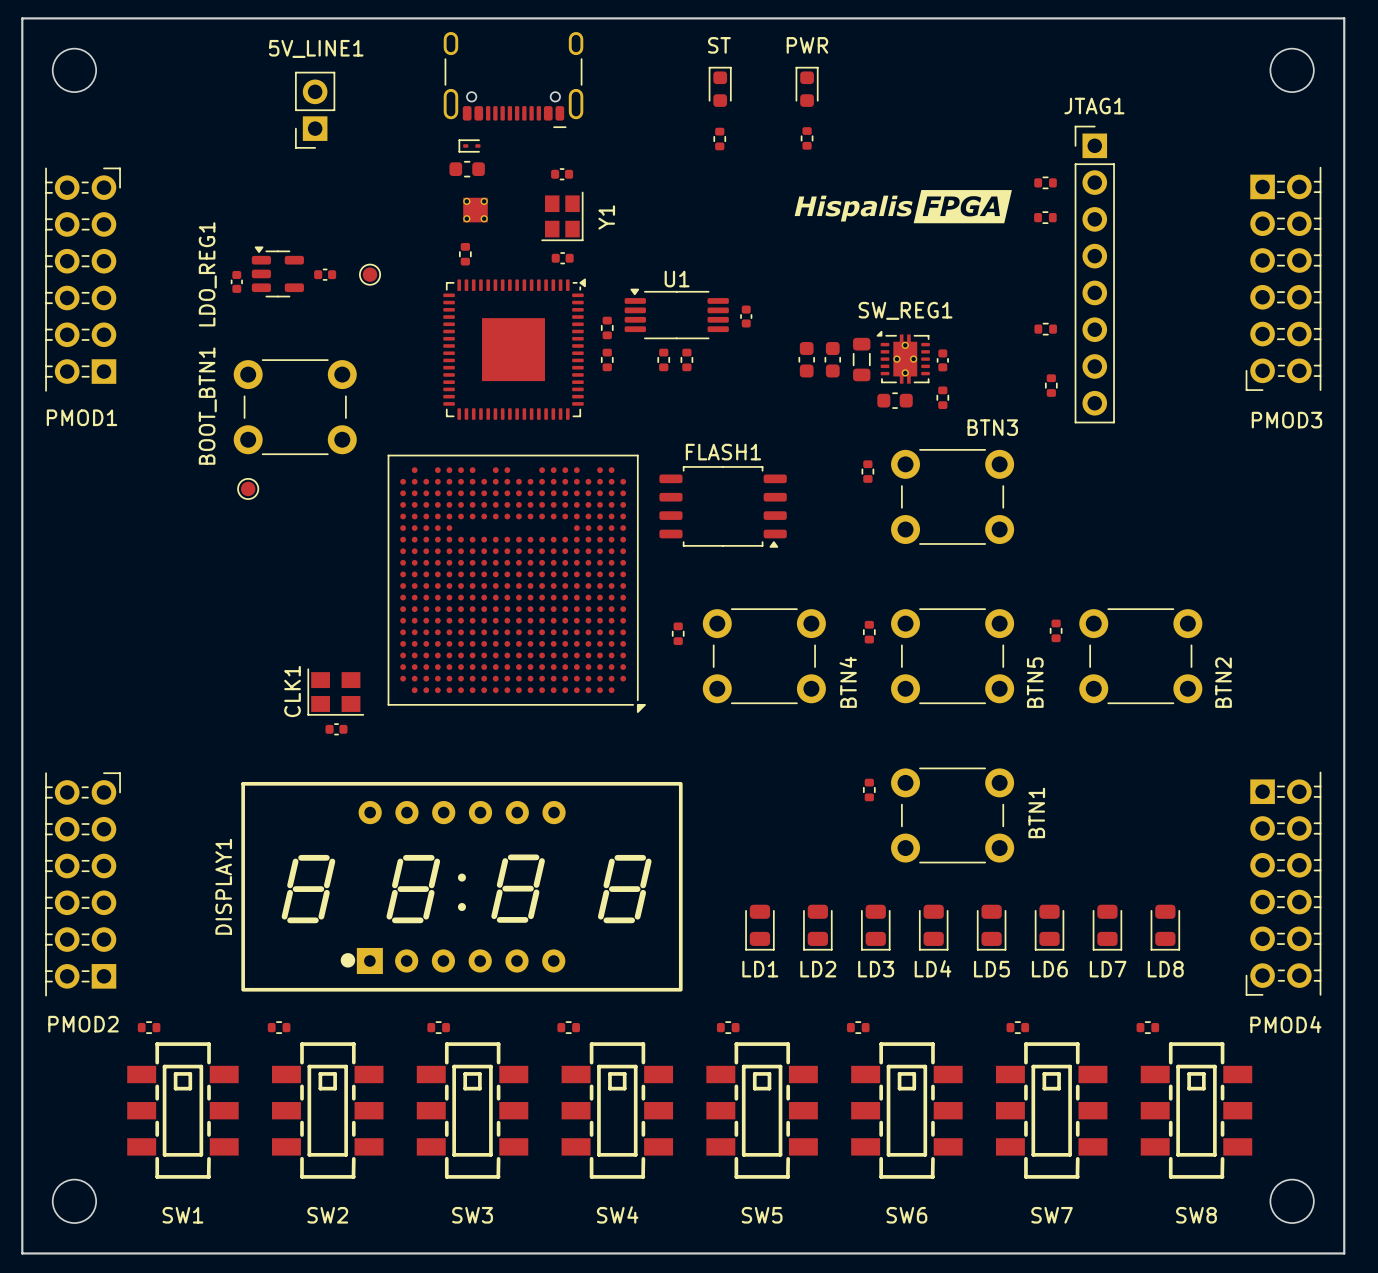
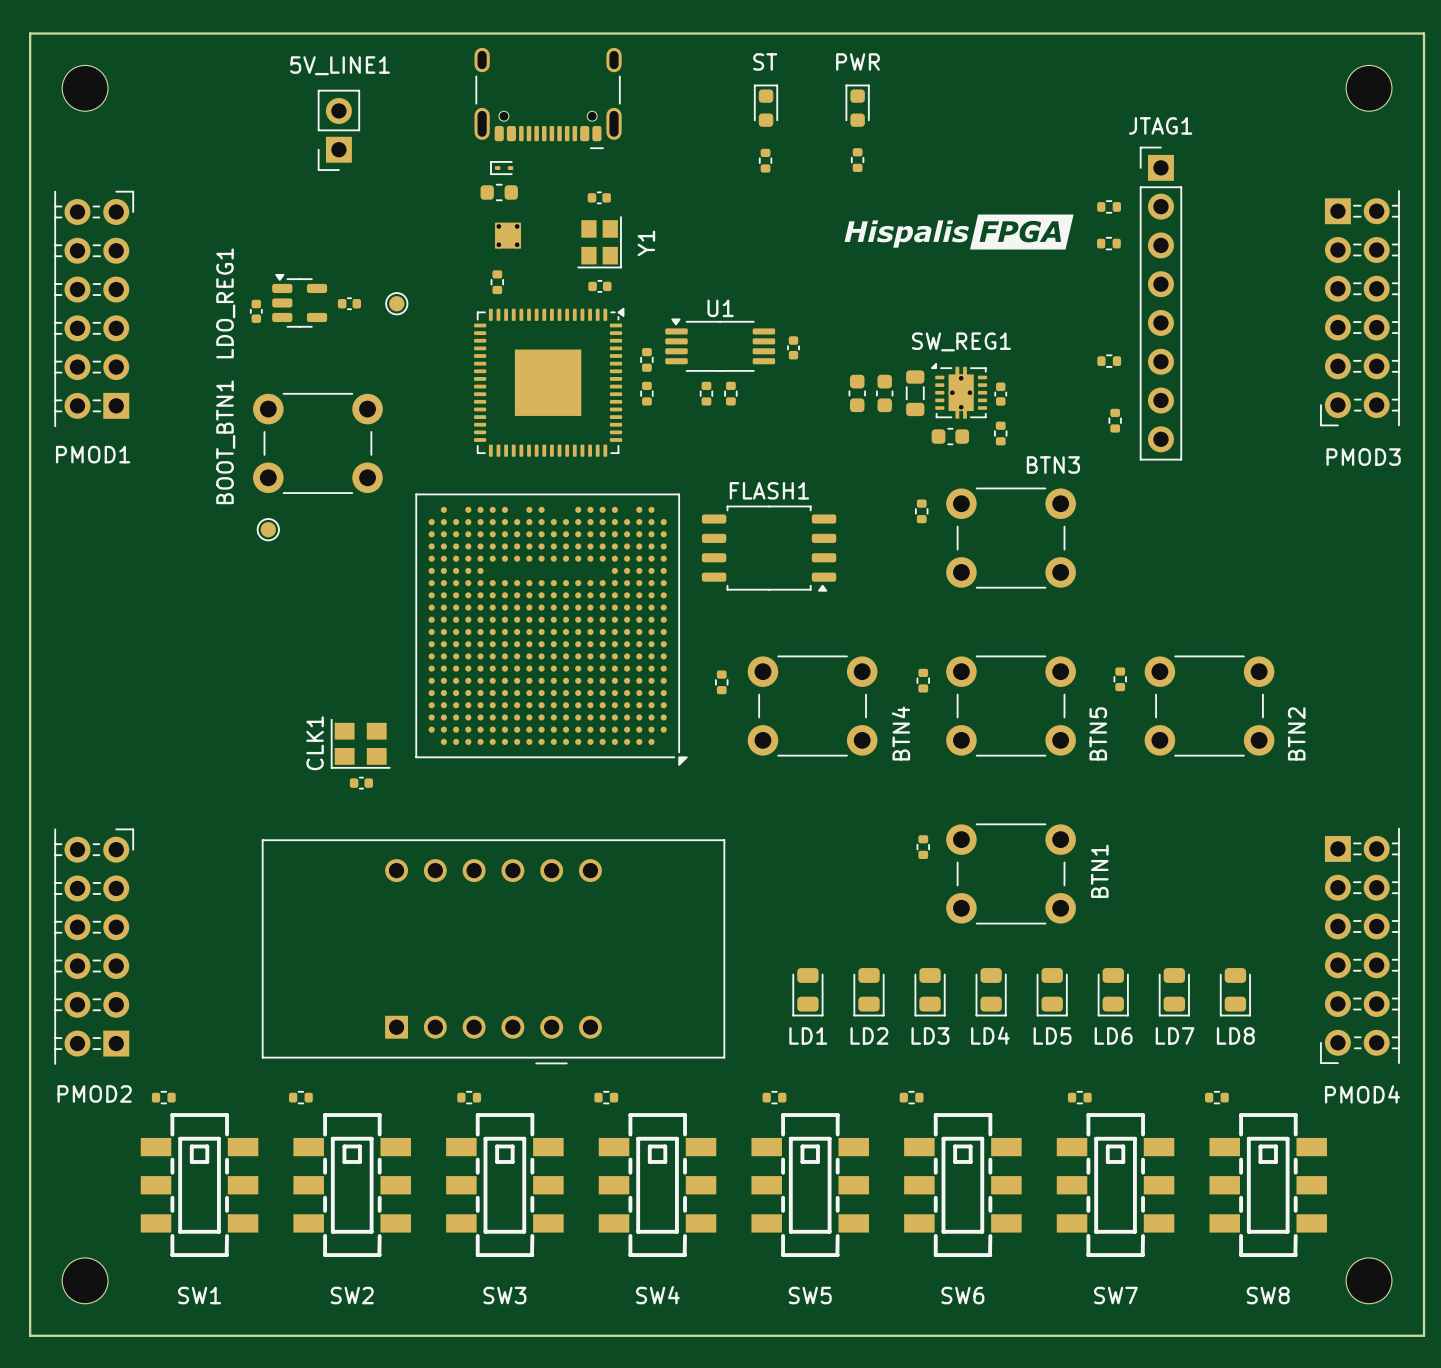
DISPLAY1: (461, 886) -> none
part: none -> (493, 951)

